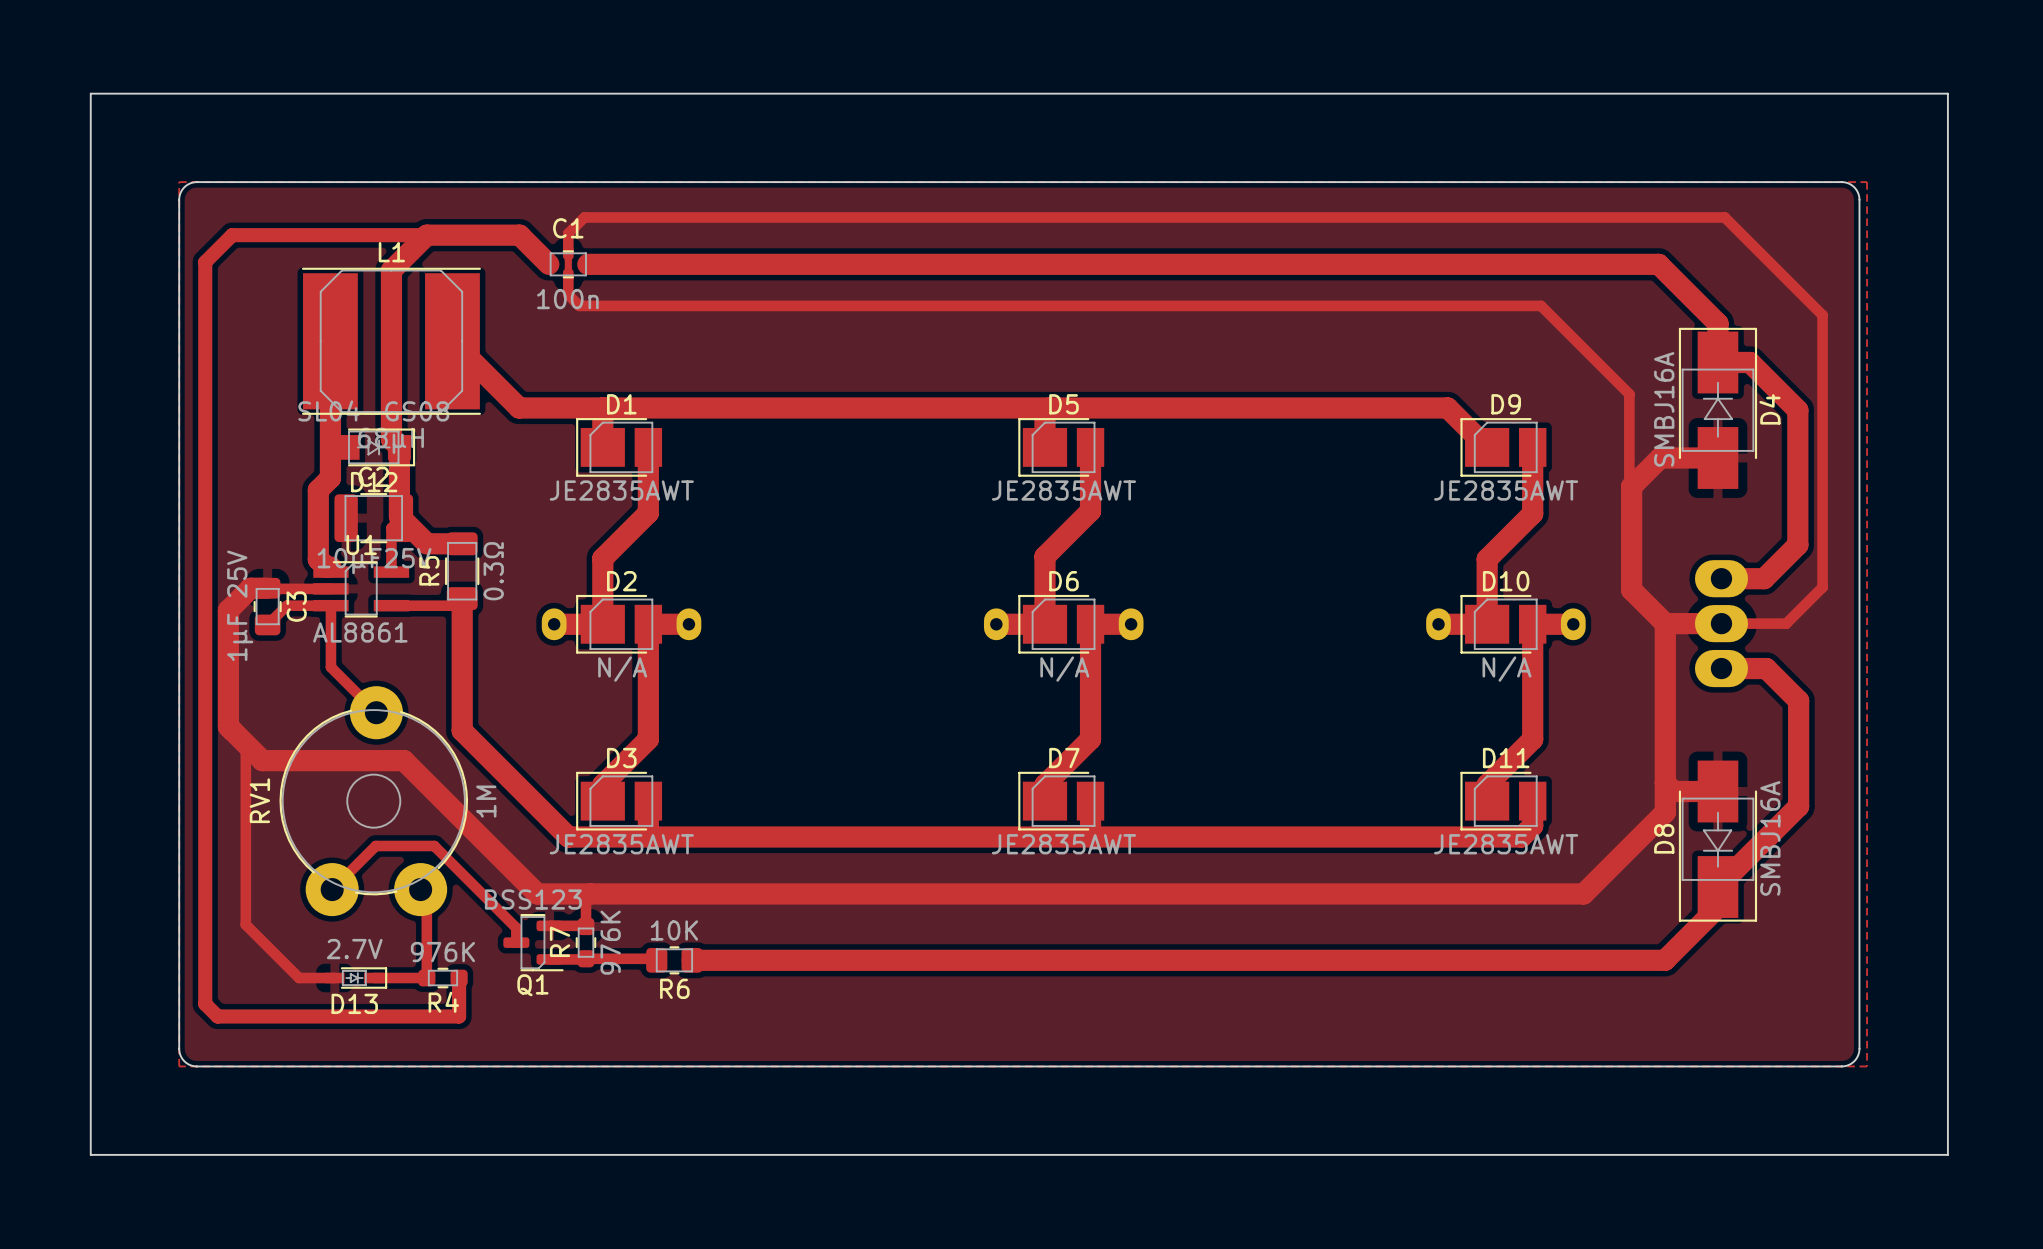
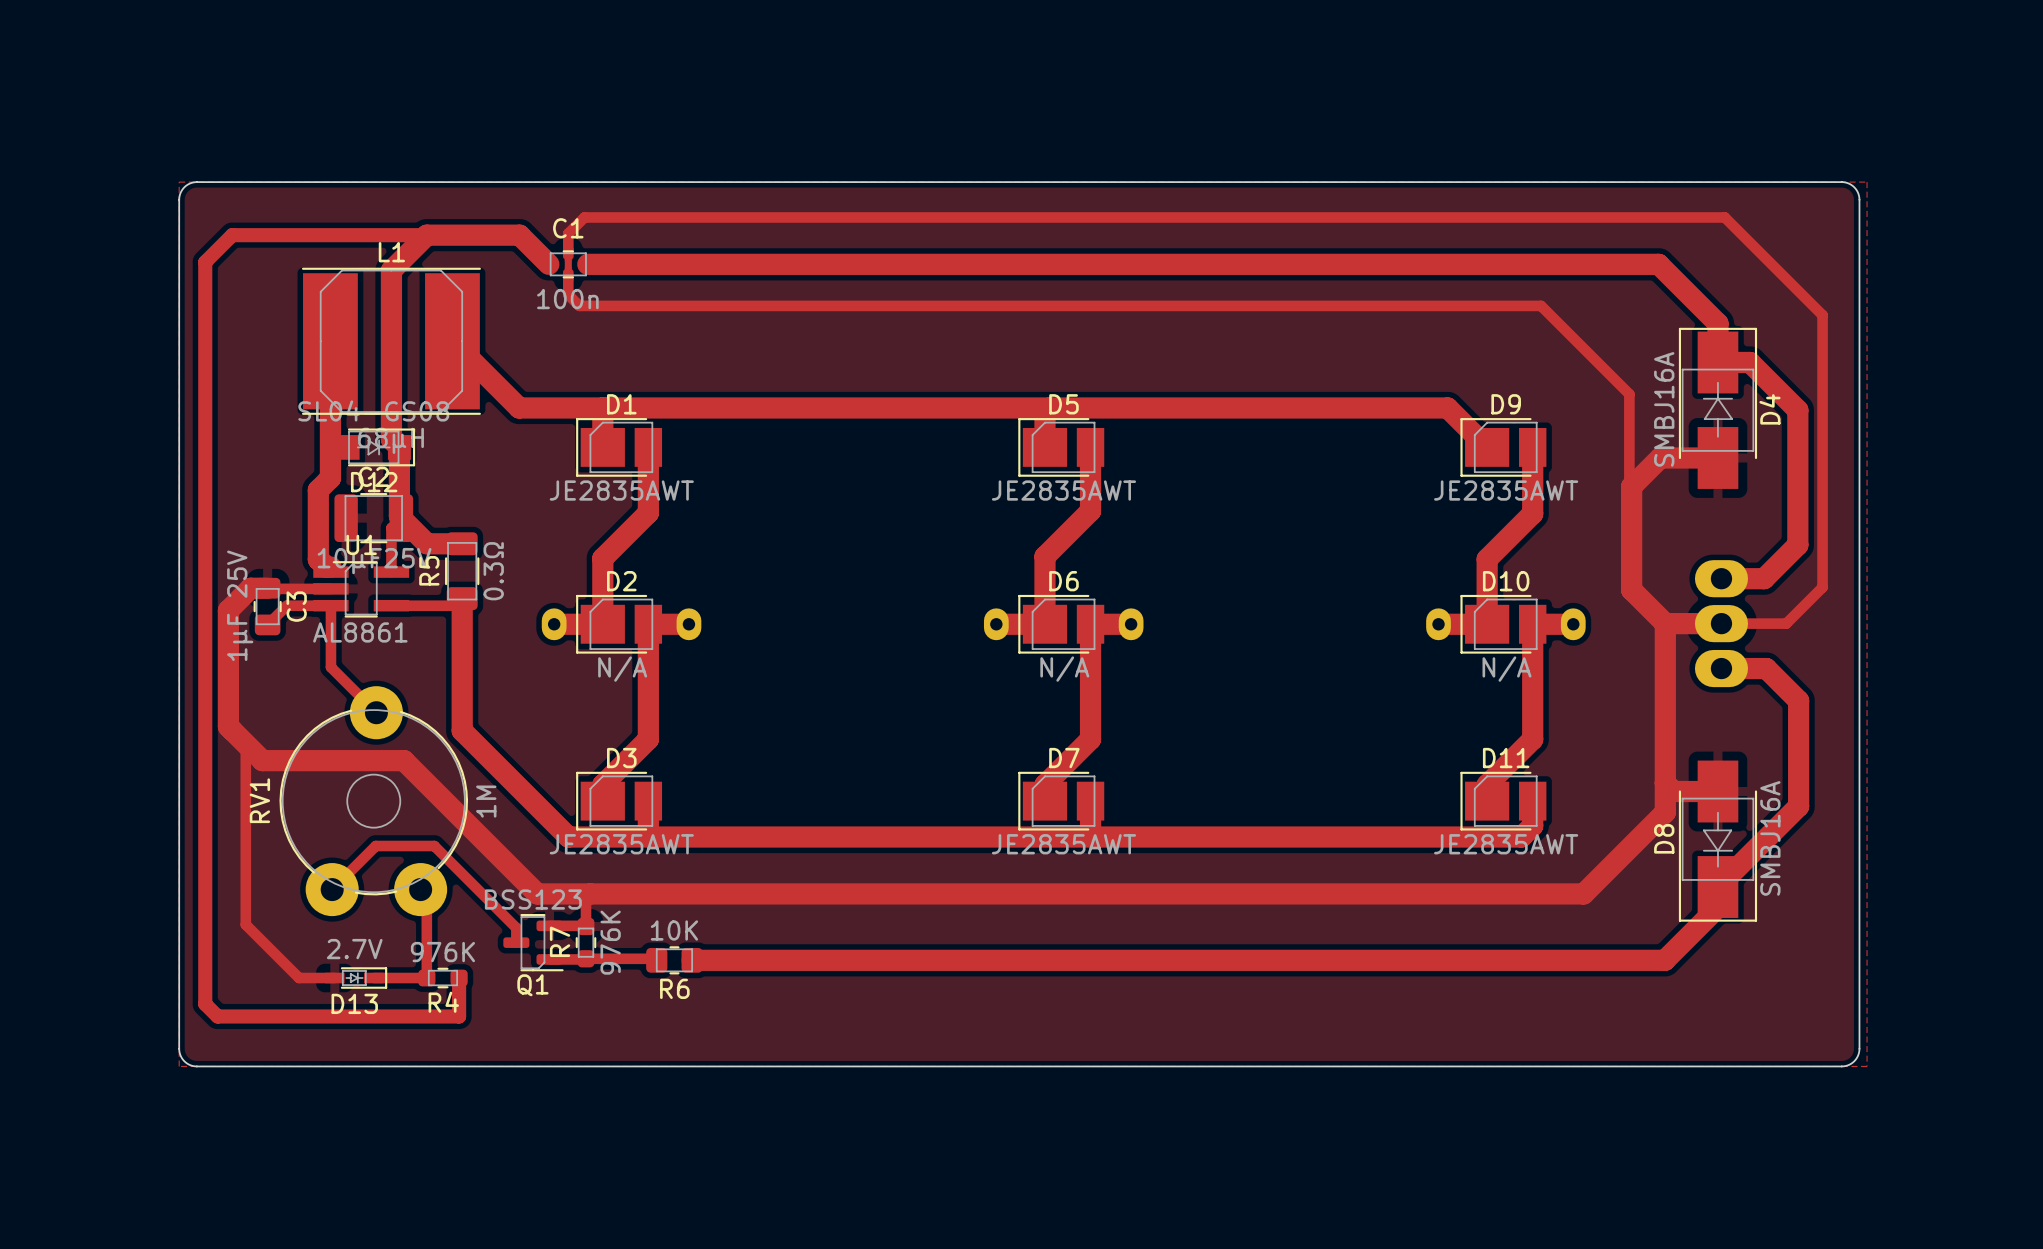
board edge: (90, 93) (1947, 93) (1947, 1154) (90, 1154) (90, 93) -> none

